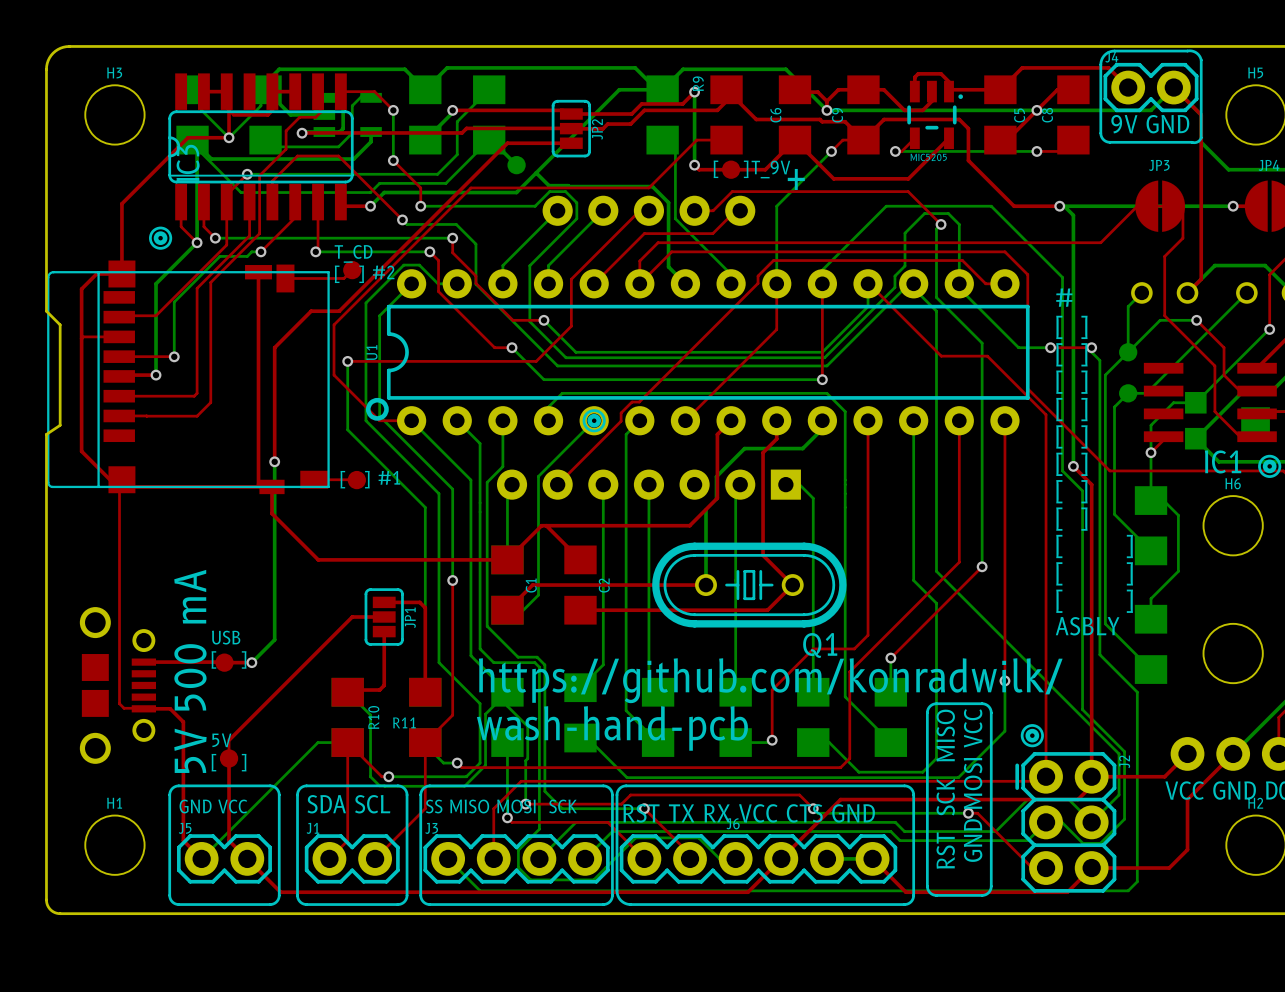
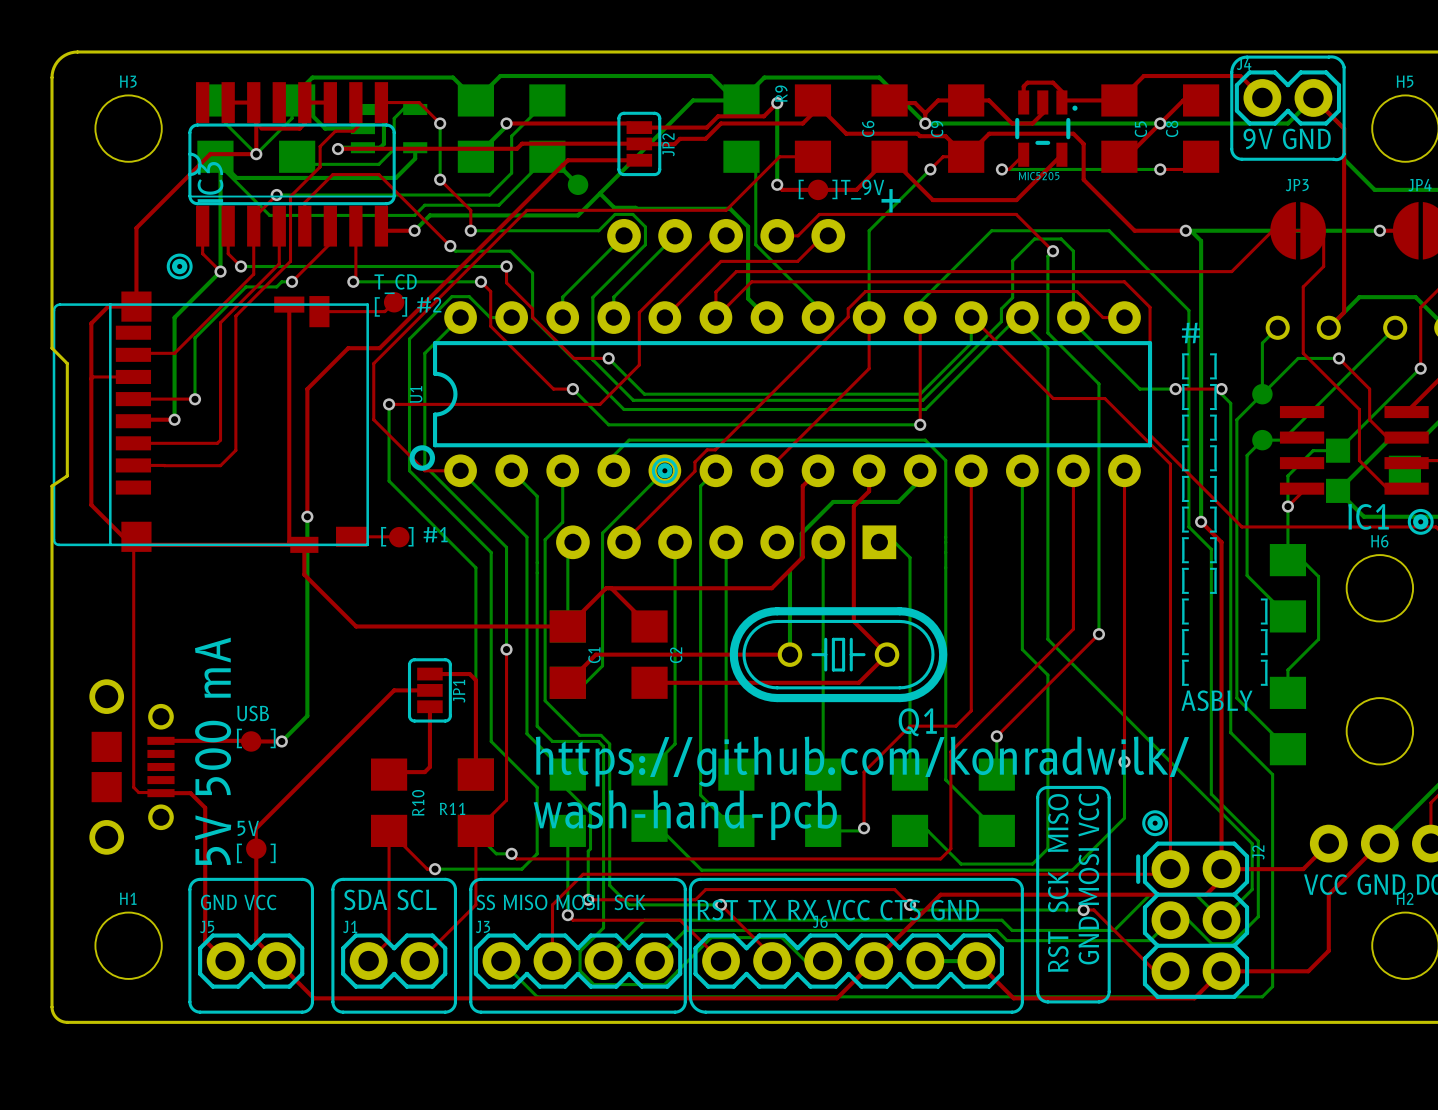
bottom track: (347, 692) (370, 715) (370, 776) (379, 785) (384, 786) (464, 786) (485, 765) (485, 714) (507, 692) -> none
bottom track: (347, 742) (317, 742) (201, 858) -> none

